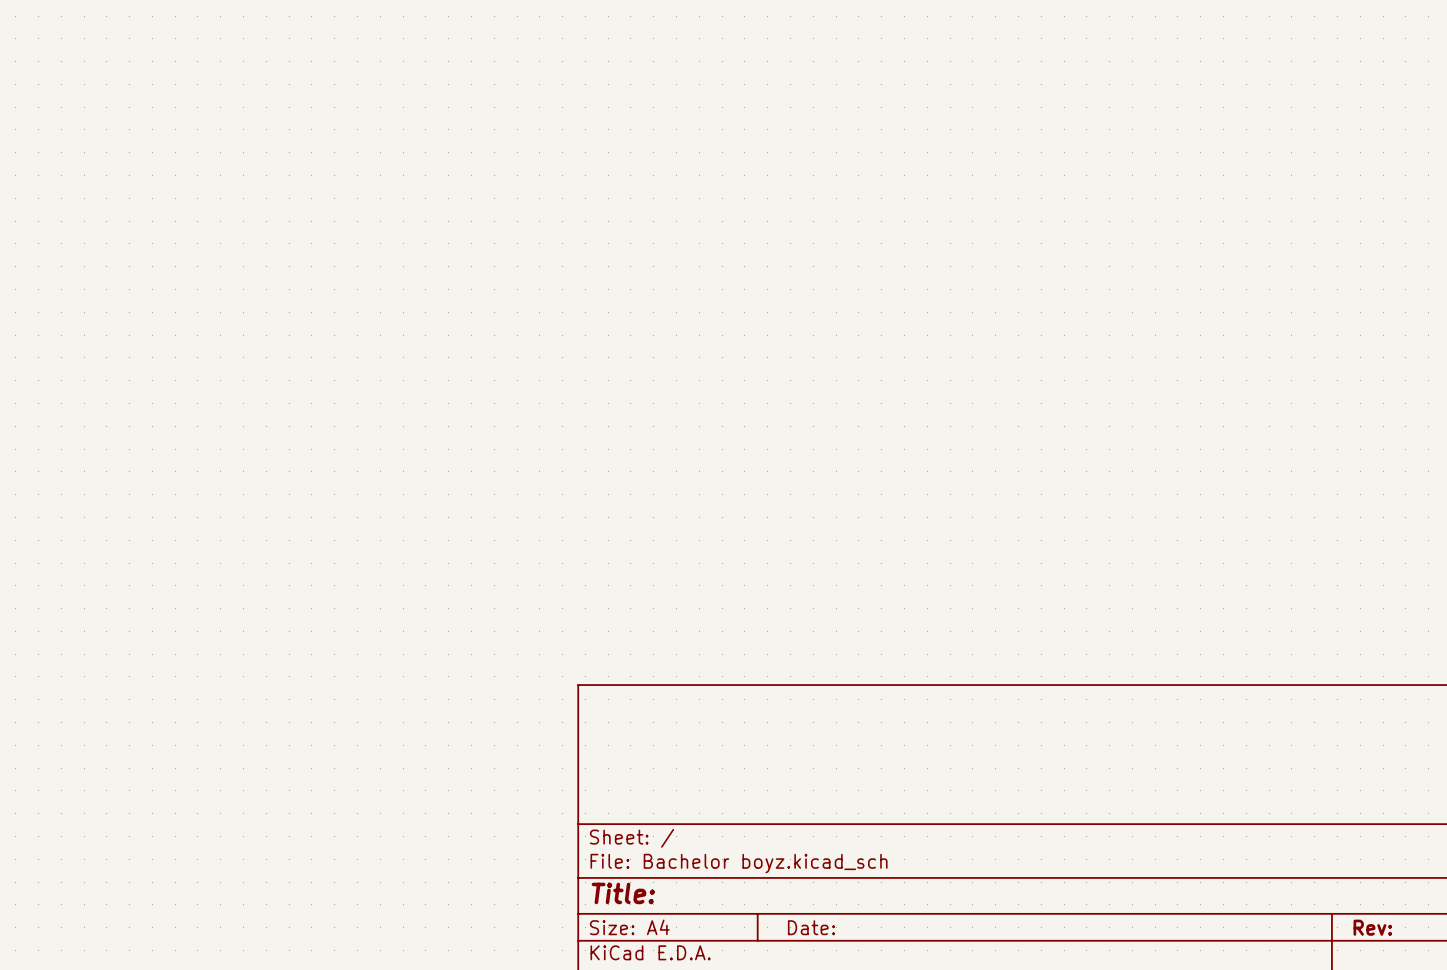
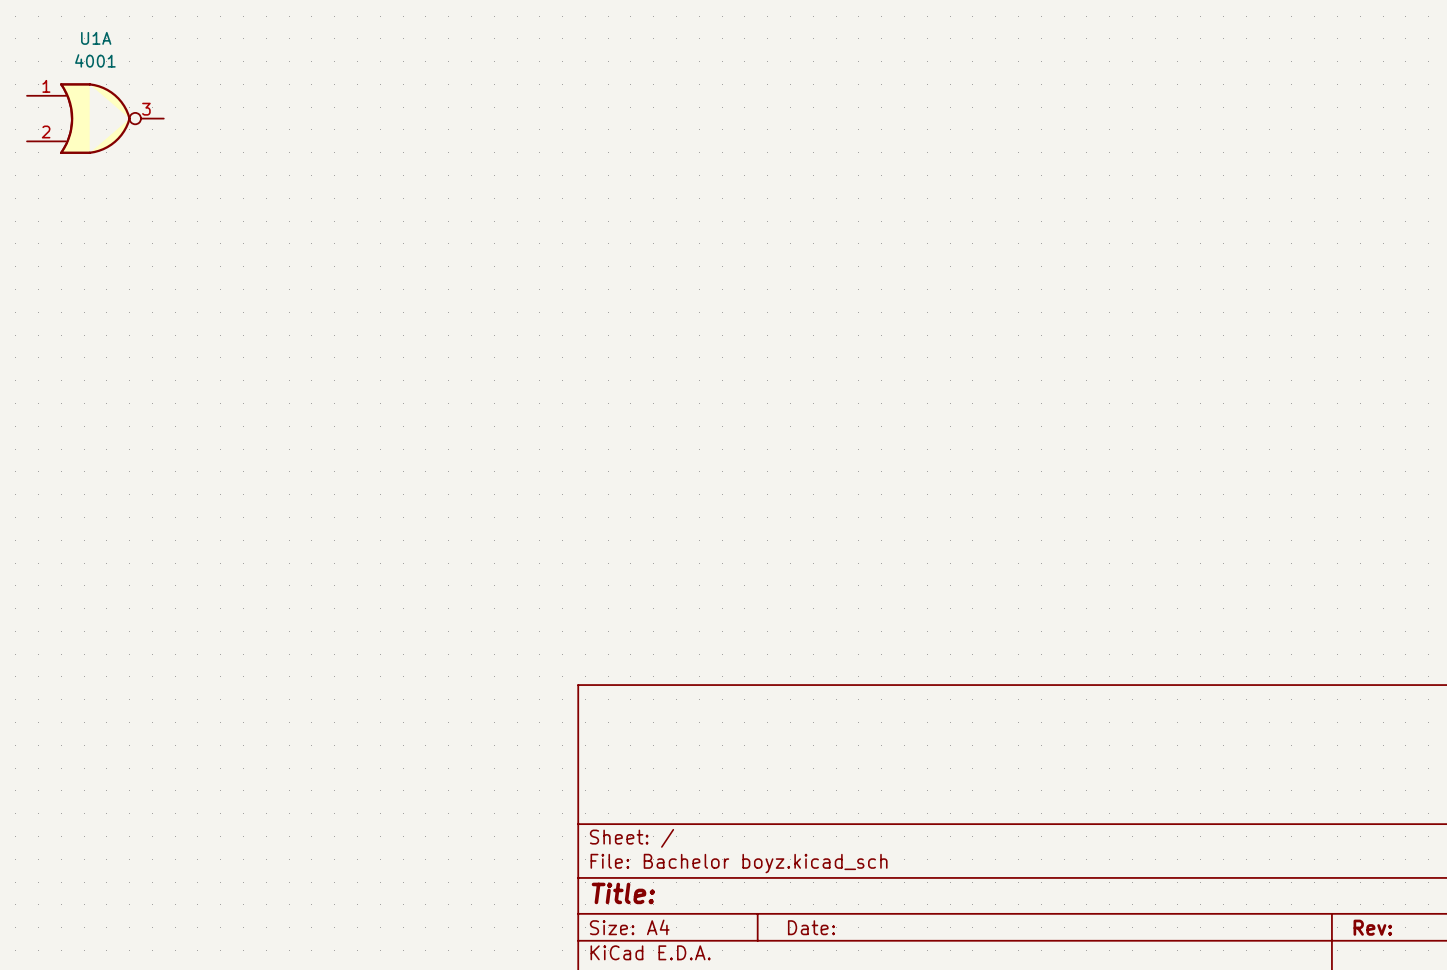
U1A: none -> 4001 (95, 118)

